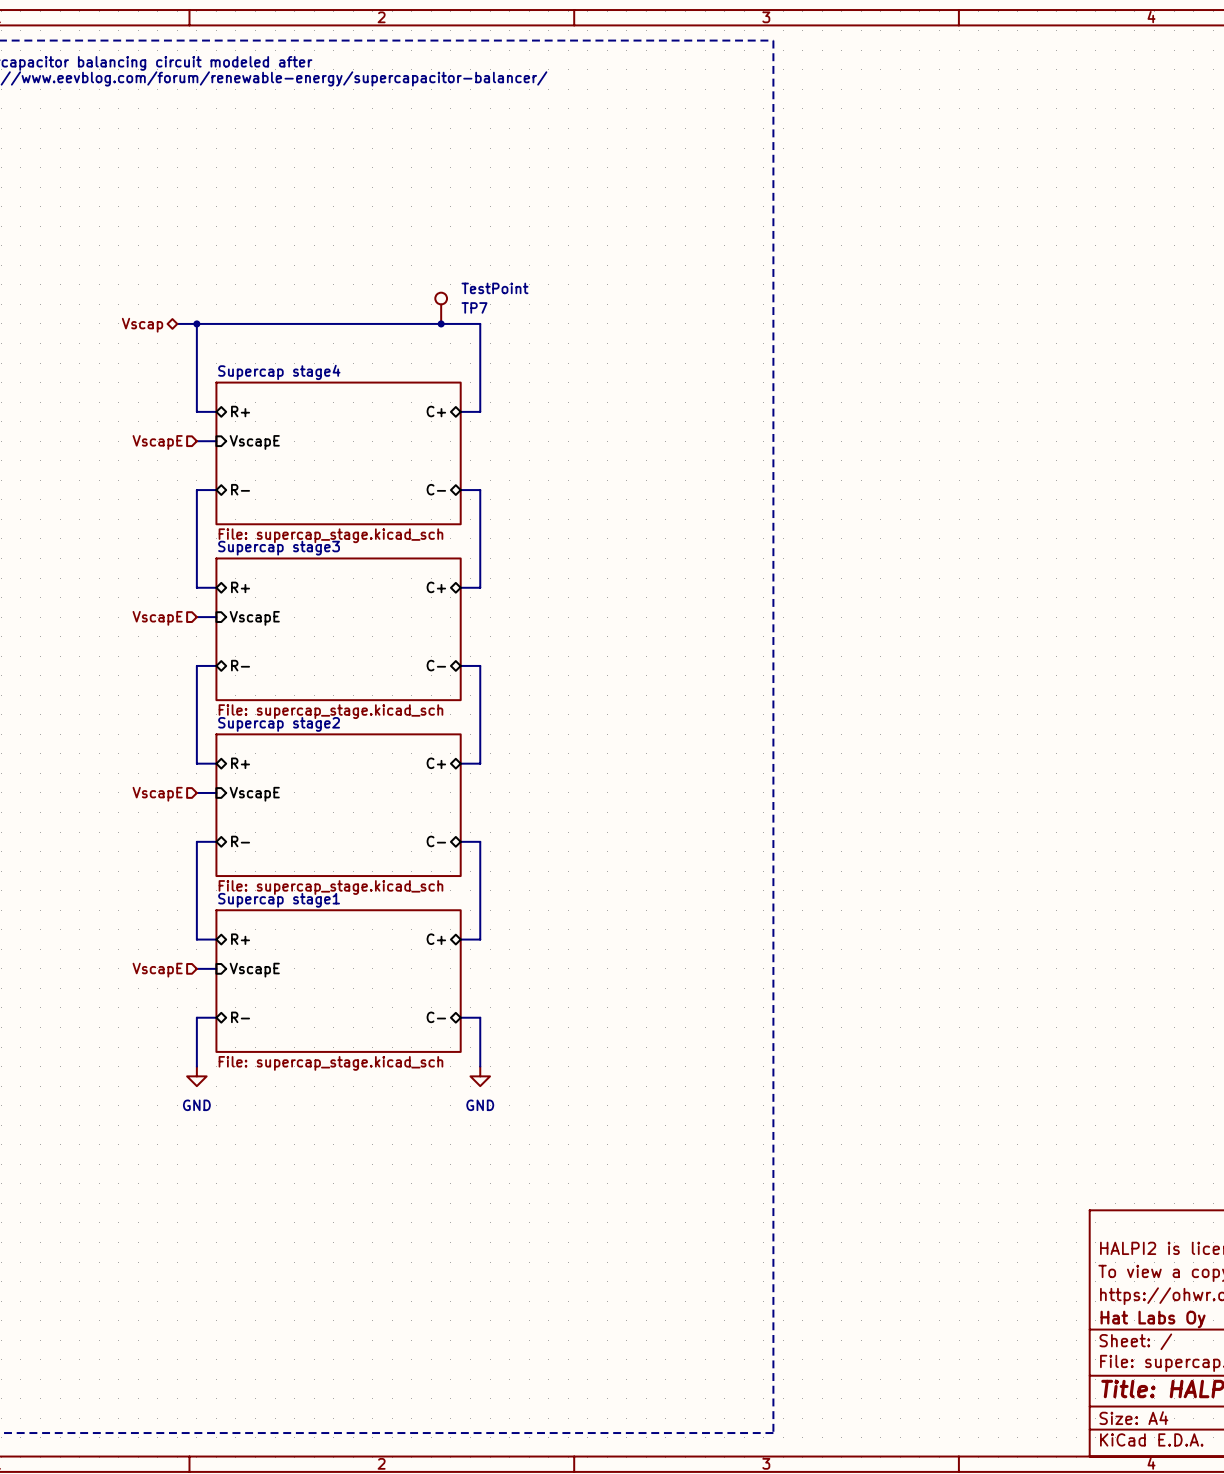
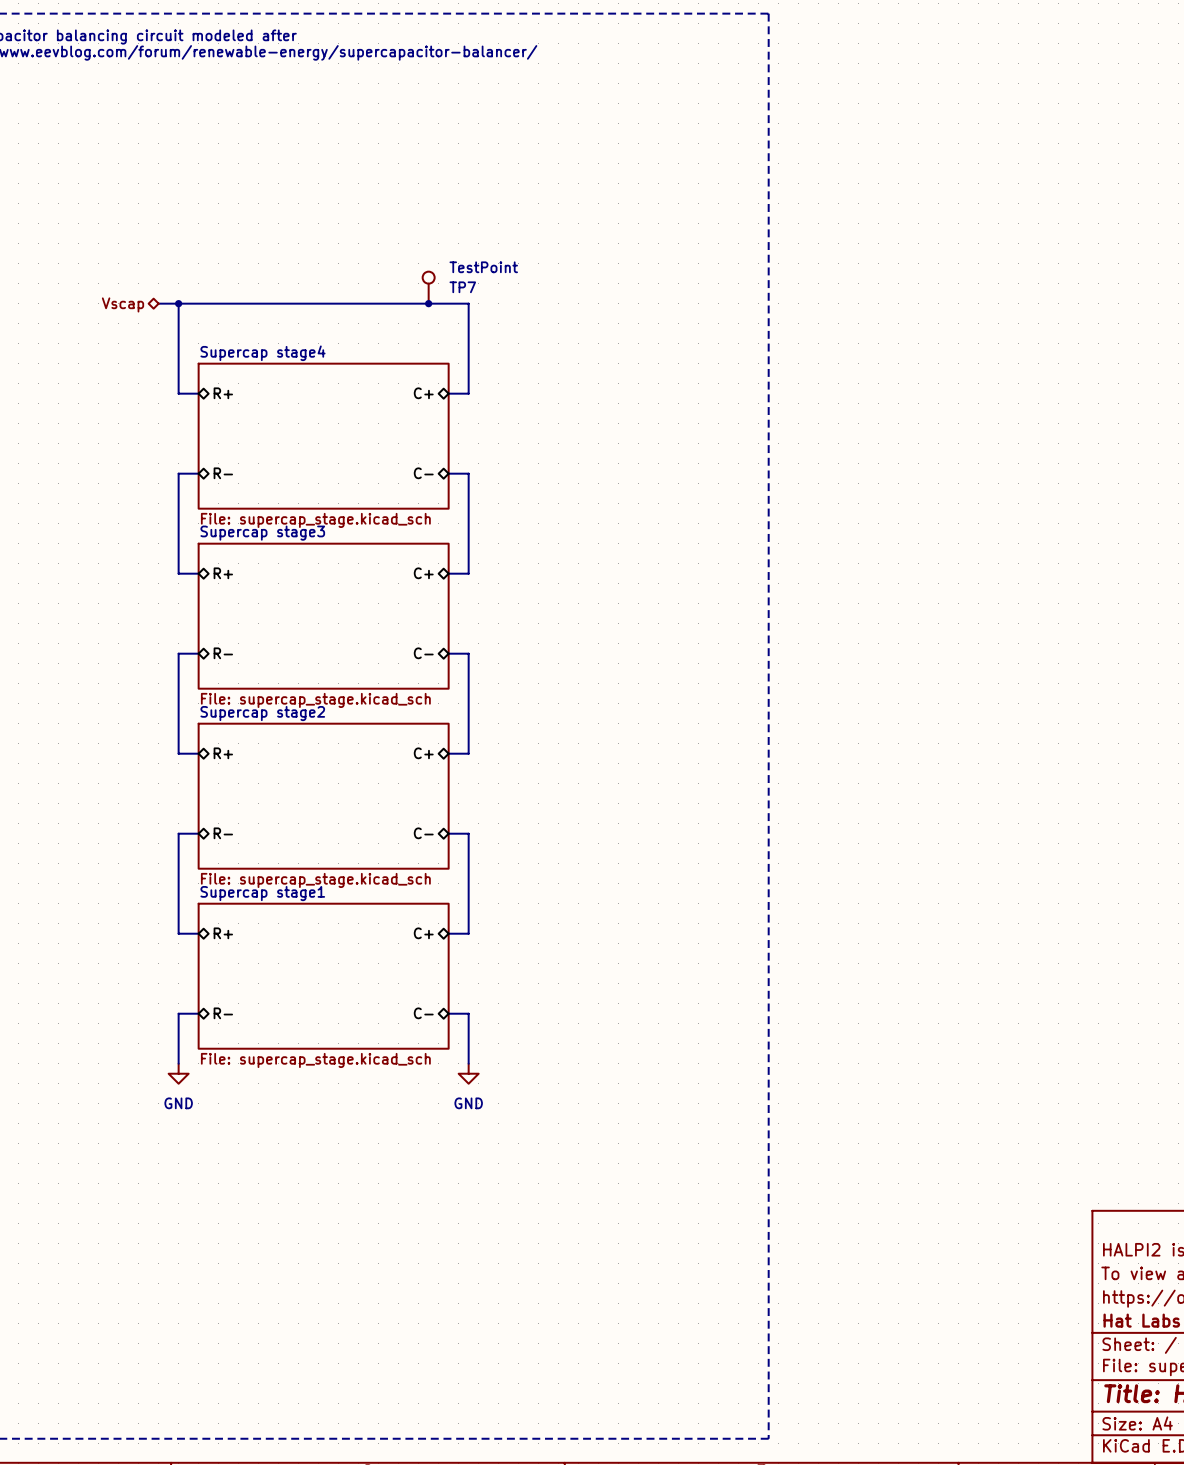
wire: (196, 441) (216, 441) -> none
hierarchical label: VscapE (157, 442) -> none
sheet pin: VscapE (254, 442) -> none
wire: (196, 617) (216, 617) -> none
hierarchical label: VscapE (157, 618) -> none
sheet pin: VscapE (254, 618) -> none
wire: (196, 792) (216, 792) -> none
hierarchical label: VscapE (157, 794) -> none
sheet pin: VscapE (254, 794) -> none
wire: (196, 968) (216, 968) -> none
hierarchical label: VscapE (157, 970) -> none
sheet pin: VscapE (254, 970) -> none

